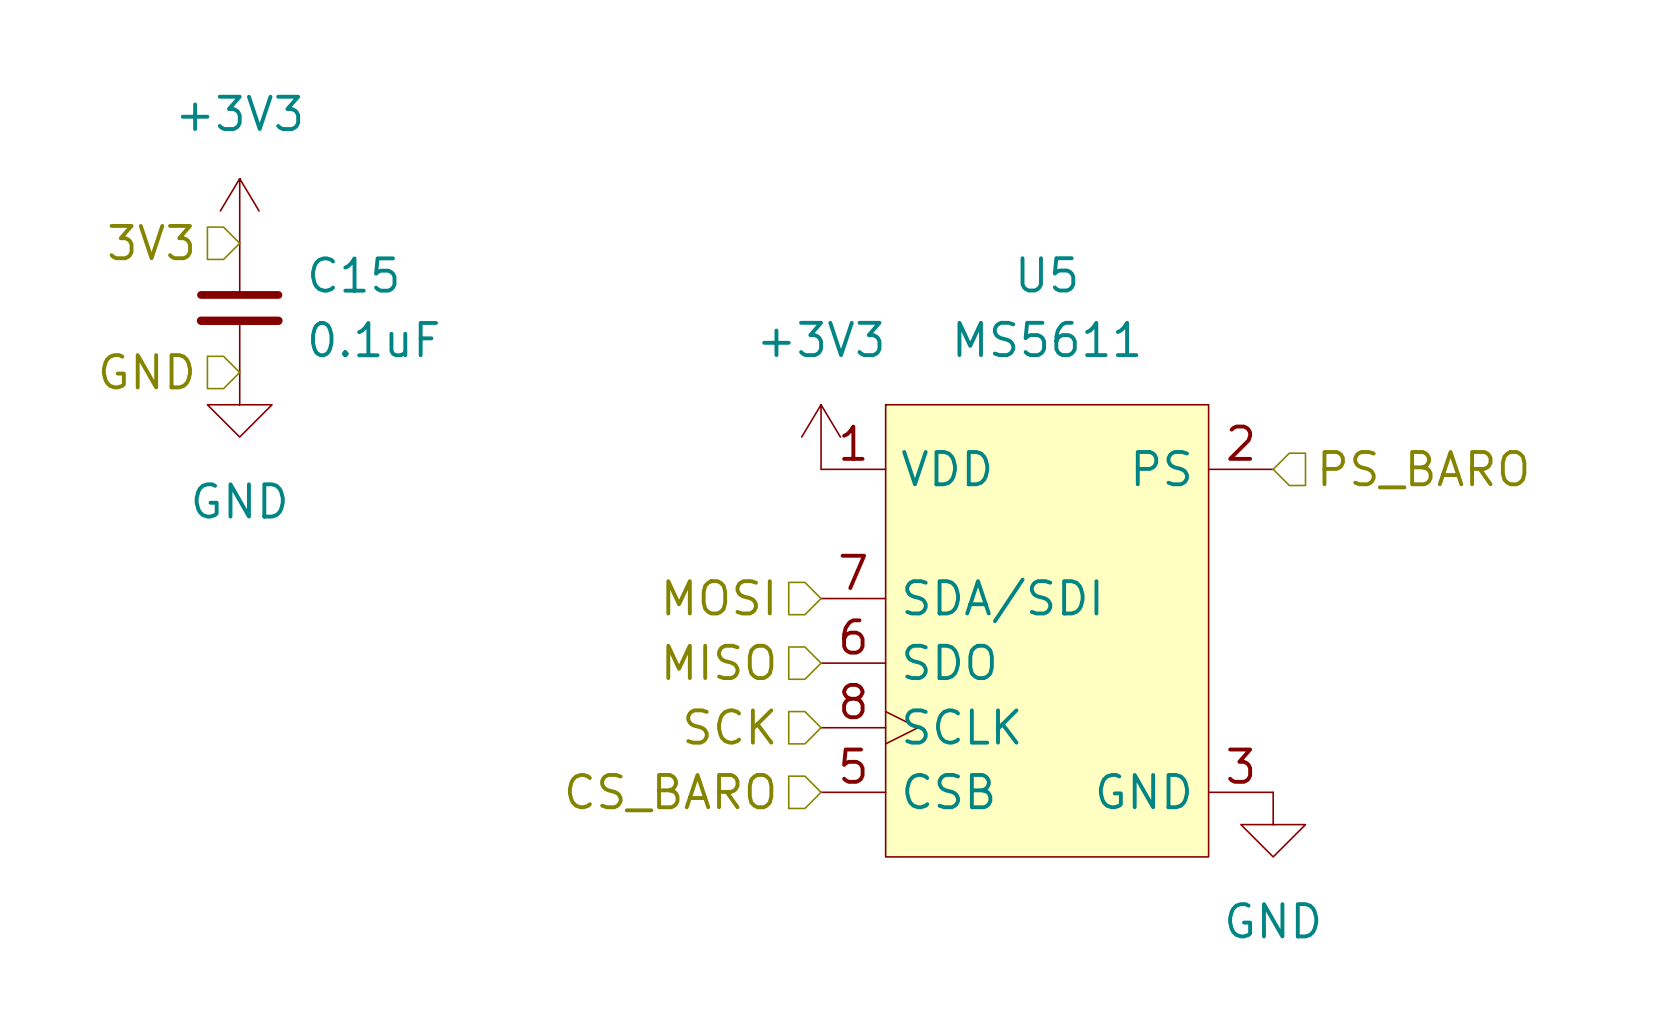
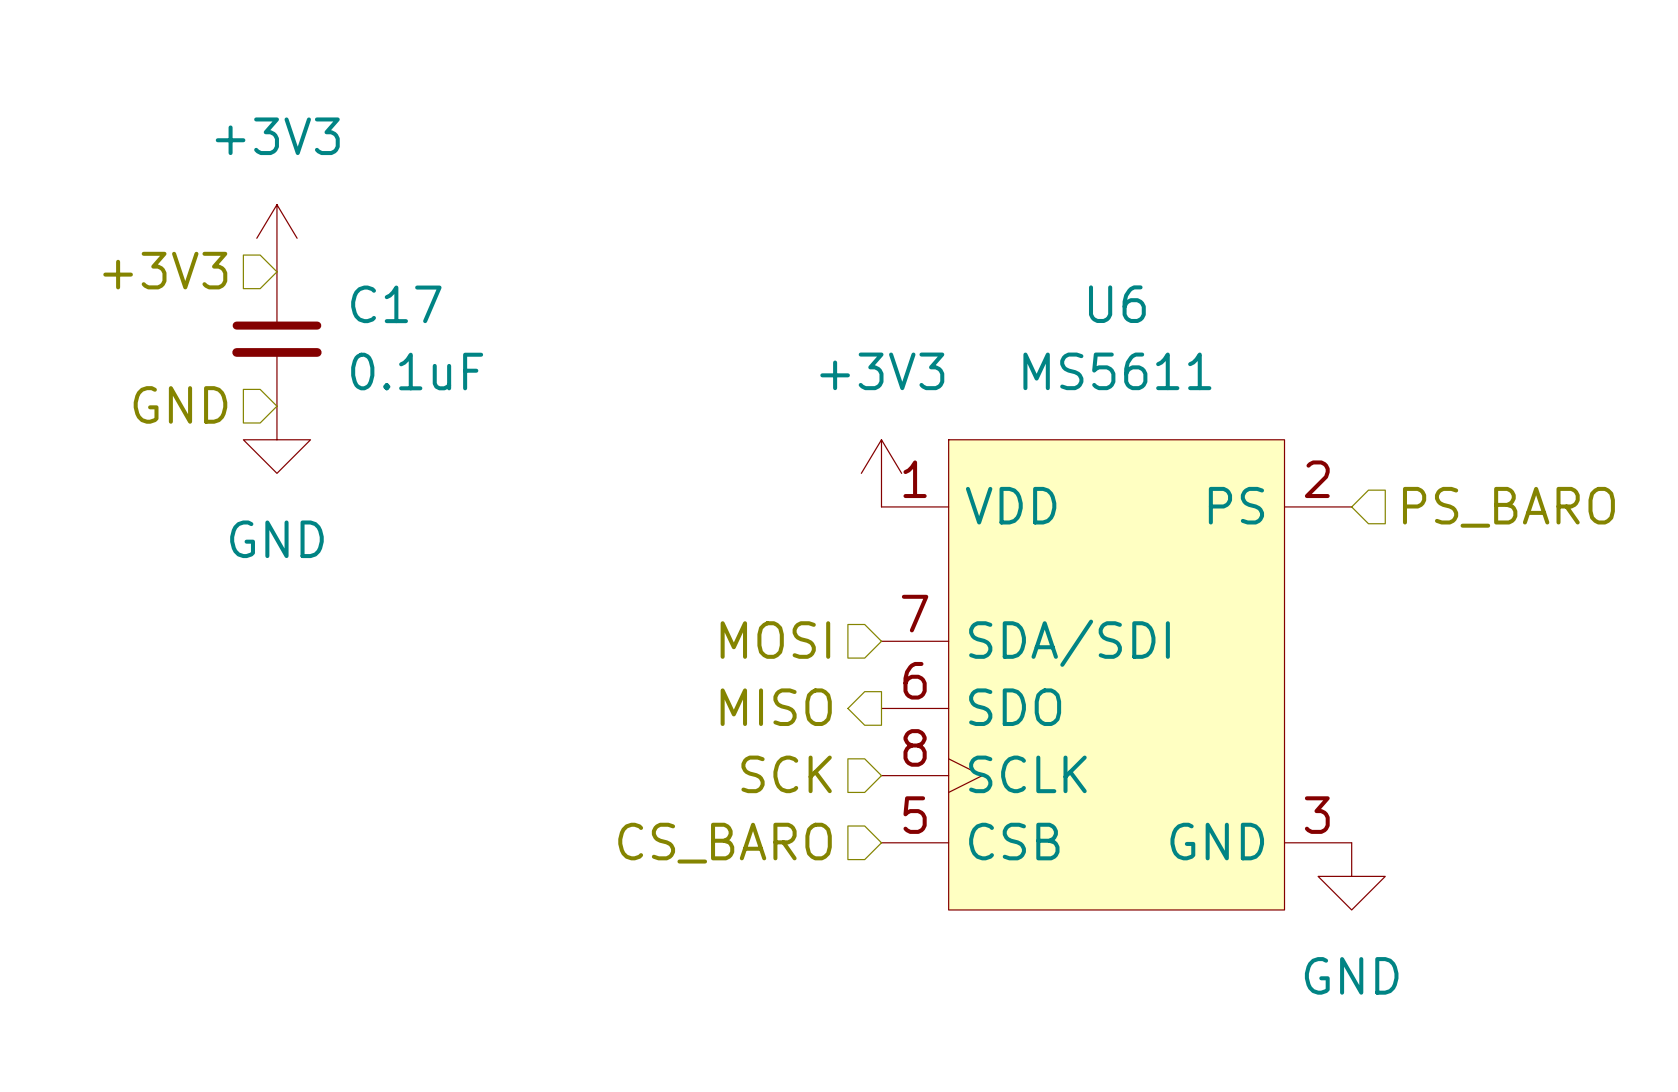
hierarchical label: 3V3 (150, 242) -> +3V3 (165, 270)
C15 name: C15 (353, 274) -> C17 (396, 304)
U5 name: U5 (1047, 274) -> U6 (1117, 304)
hierarchical label shape: input (719, 661) -> output (776, 707)

